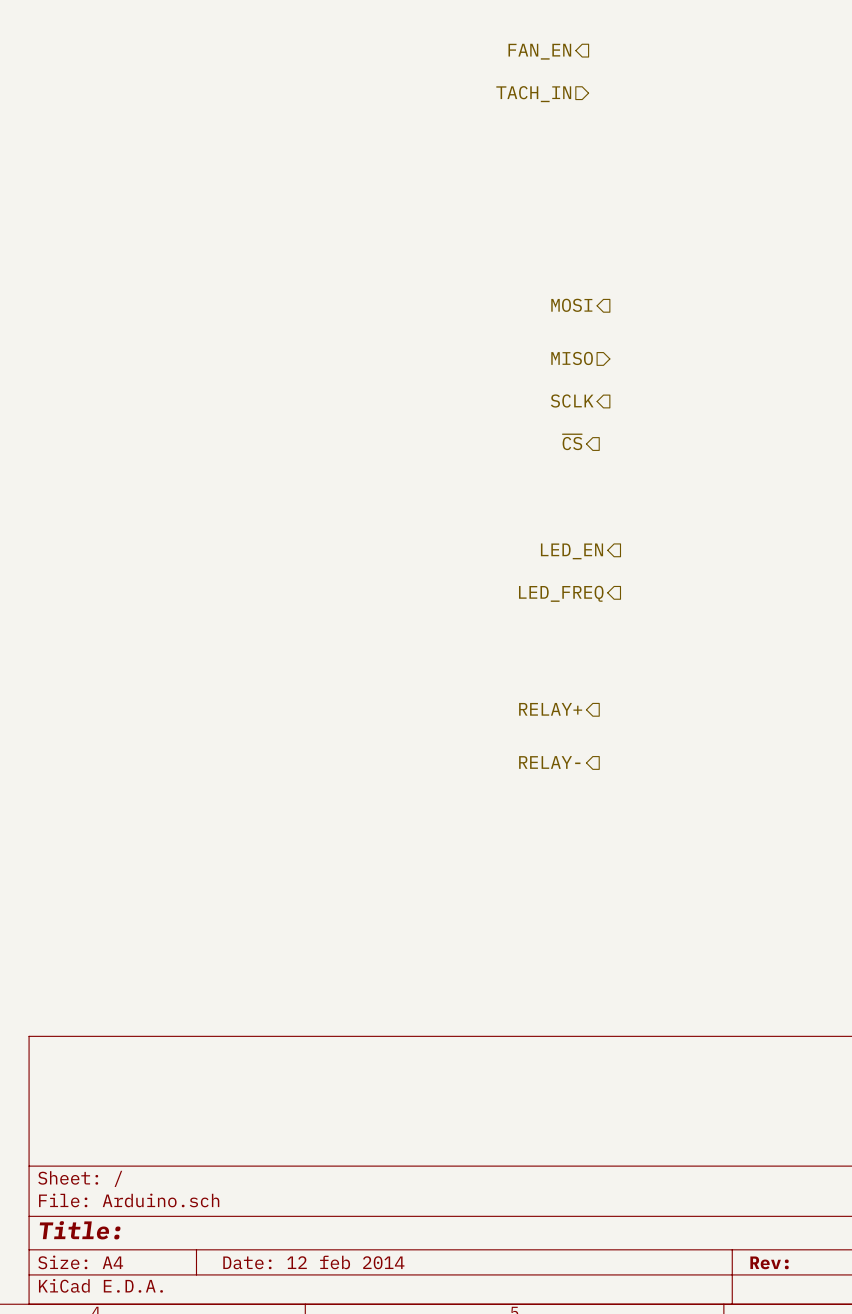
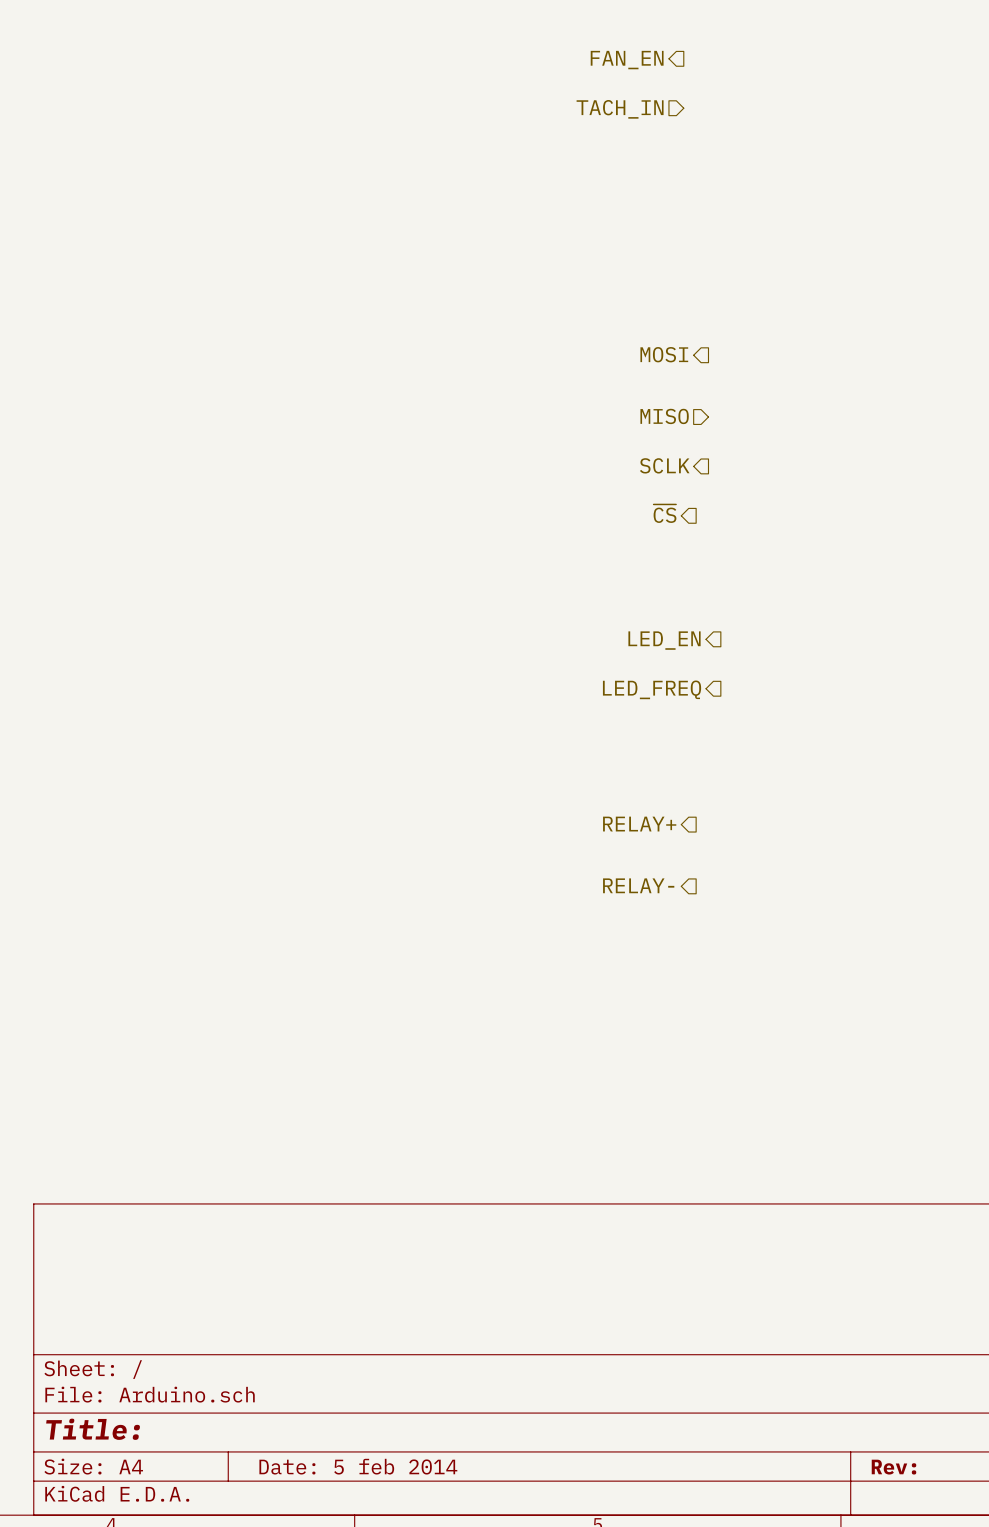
title block: Date: 12 feb 2014 (313, 1262) -> Date: 5 feb 2014 (358, 1466)

